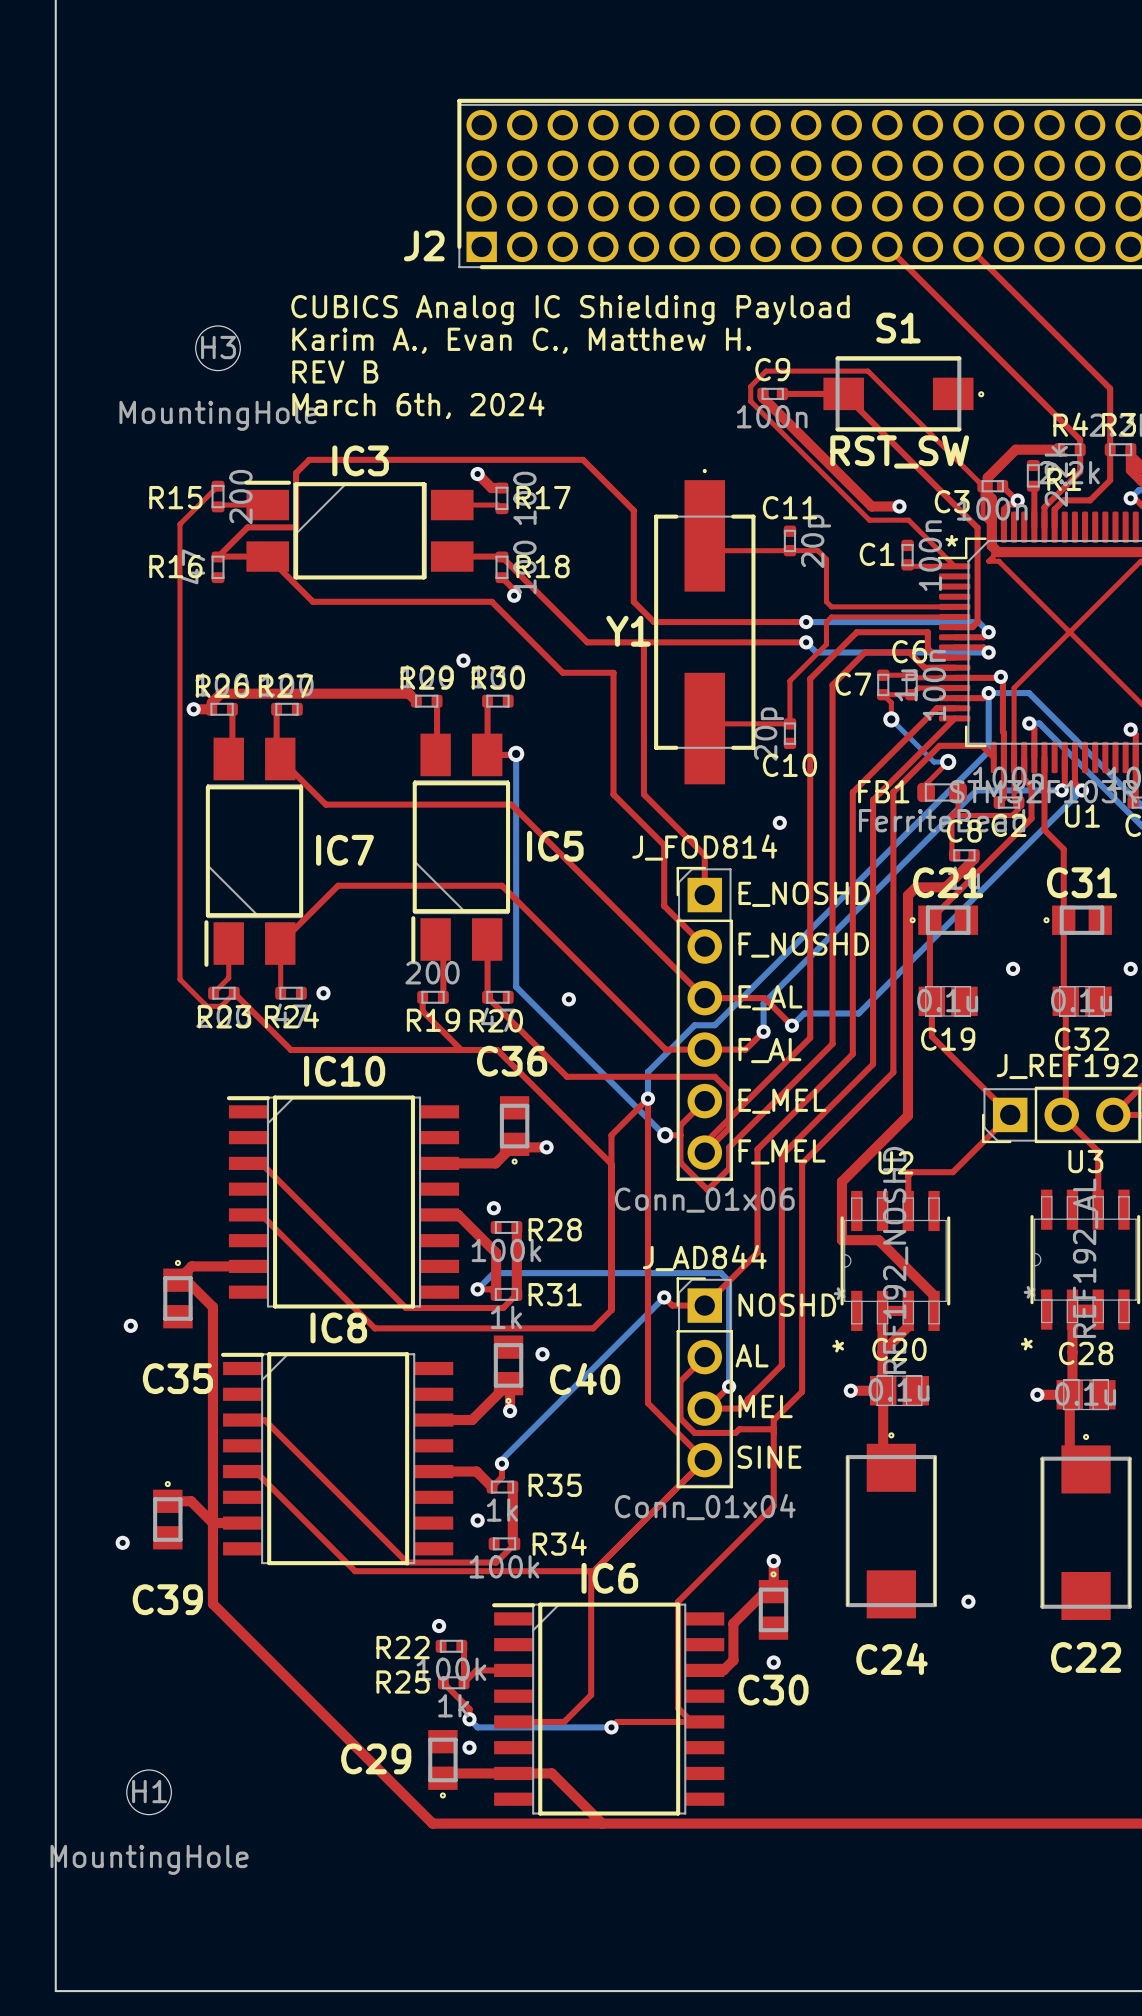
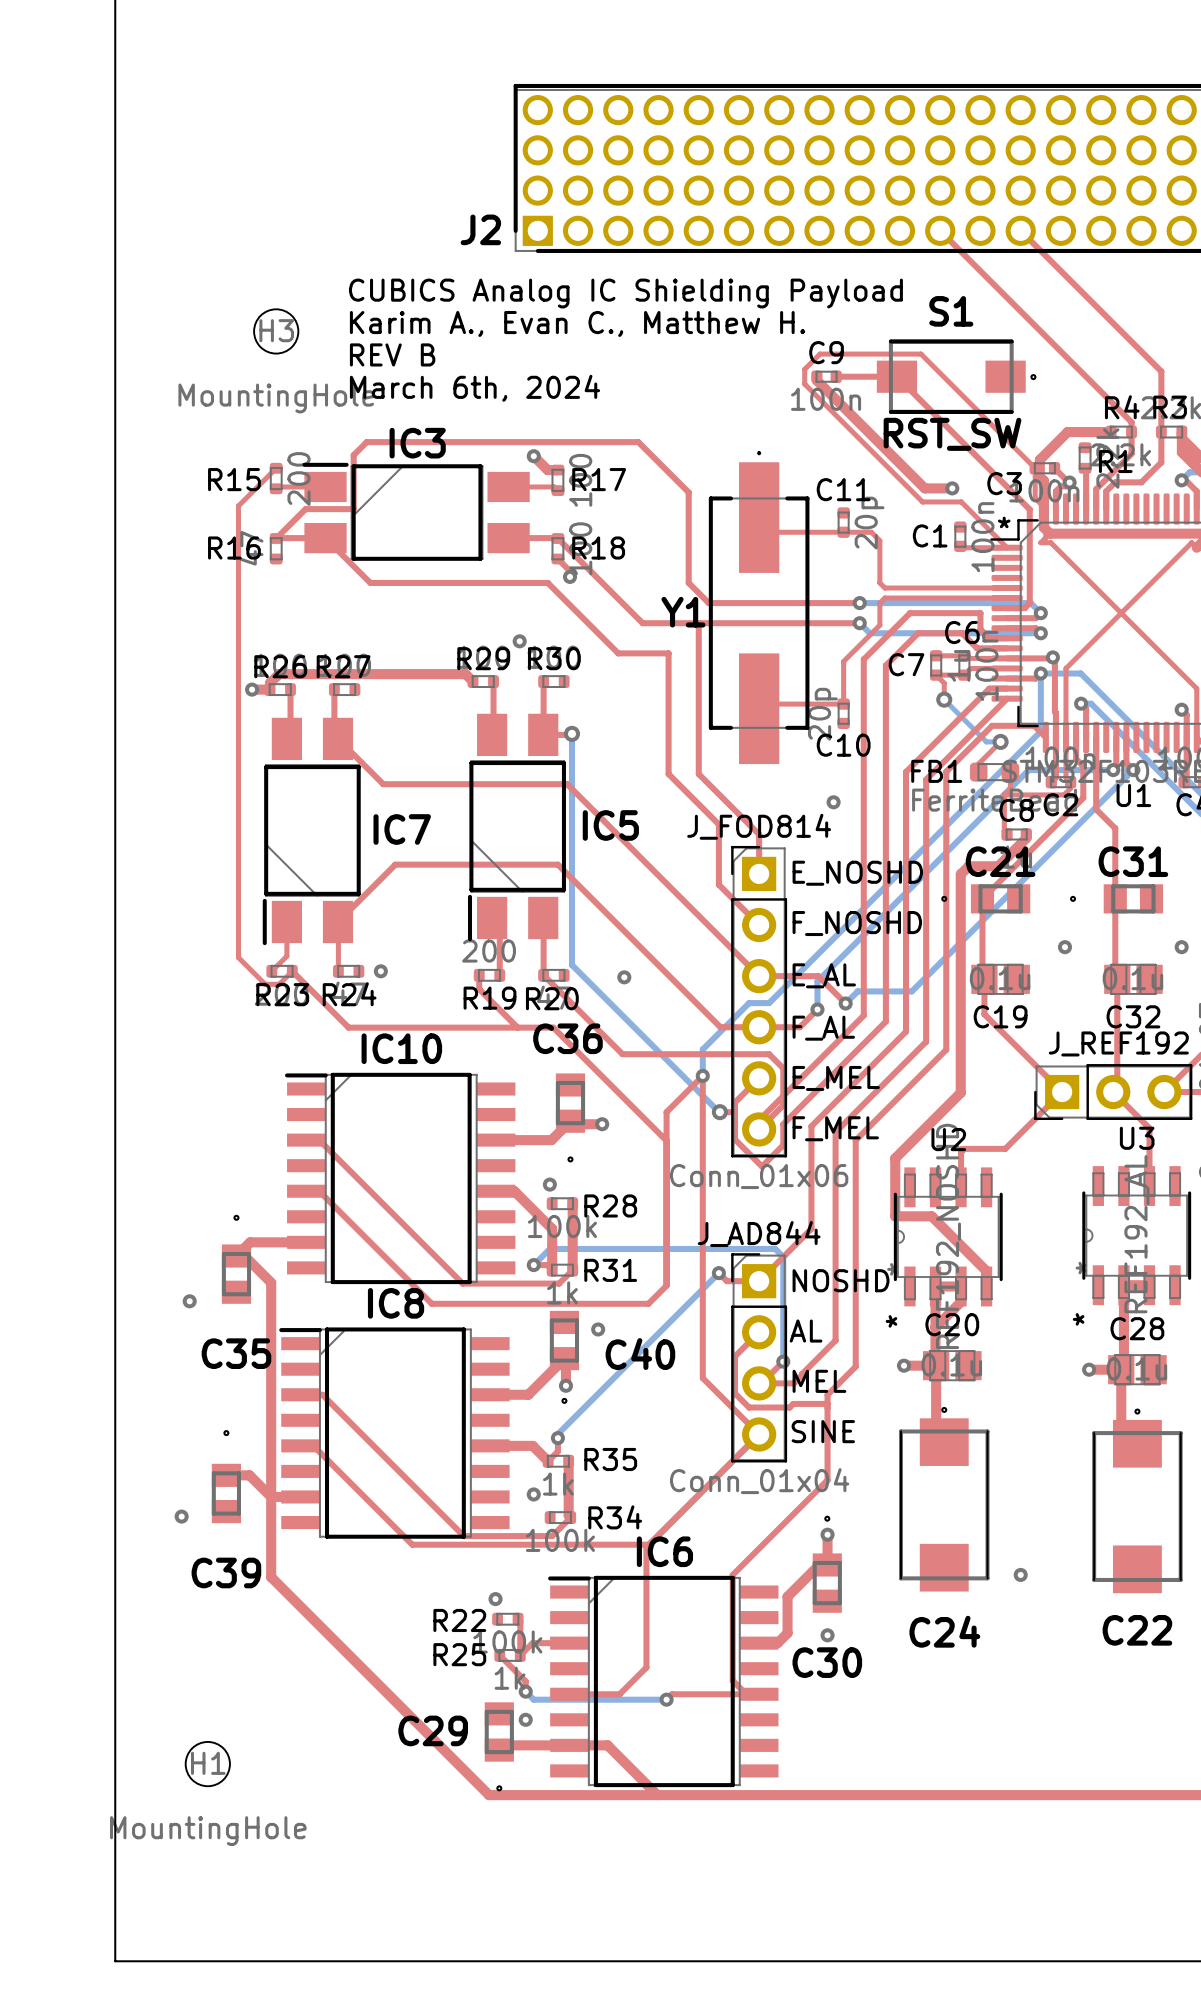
C21 footprint: [909, 905, 979, 935] -> [941, 884, 1031, 914]
C31 footprint: [1043, 905, 1112, 935] -> [1070, 884, 1164, 914]
C36 footprint: [499, 1096, 530, 1165] -> [555, 1073, 586, 1163]
C35 footprint: [163, 1259, 193, 1329] -> [221, 1214, 252, 1304]
C40 footprint: [493, 1335, 524, 1404] -> [549, 1310, 580, 1404]
C39 footprint: [153, 1480, 183, 1550] -> [211, 1430, 241, 1524]
C30 footprint: [758, 1571, 789, 1640] -> [812, 1515, 842, 1613]
C29 footprint: [428, 1730, 458, 1799] -> [484, 1702, 514, 1792]

